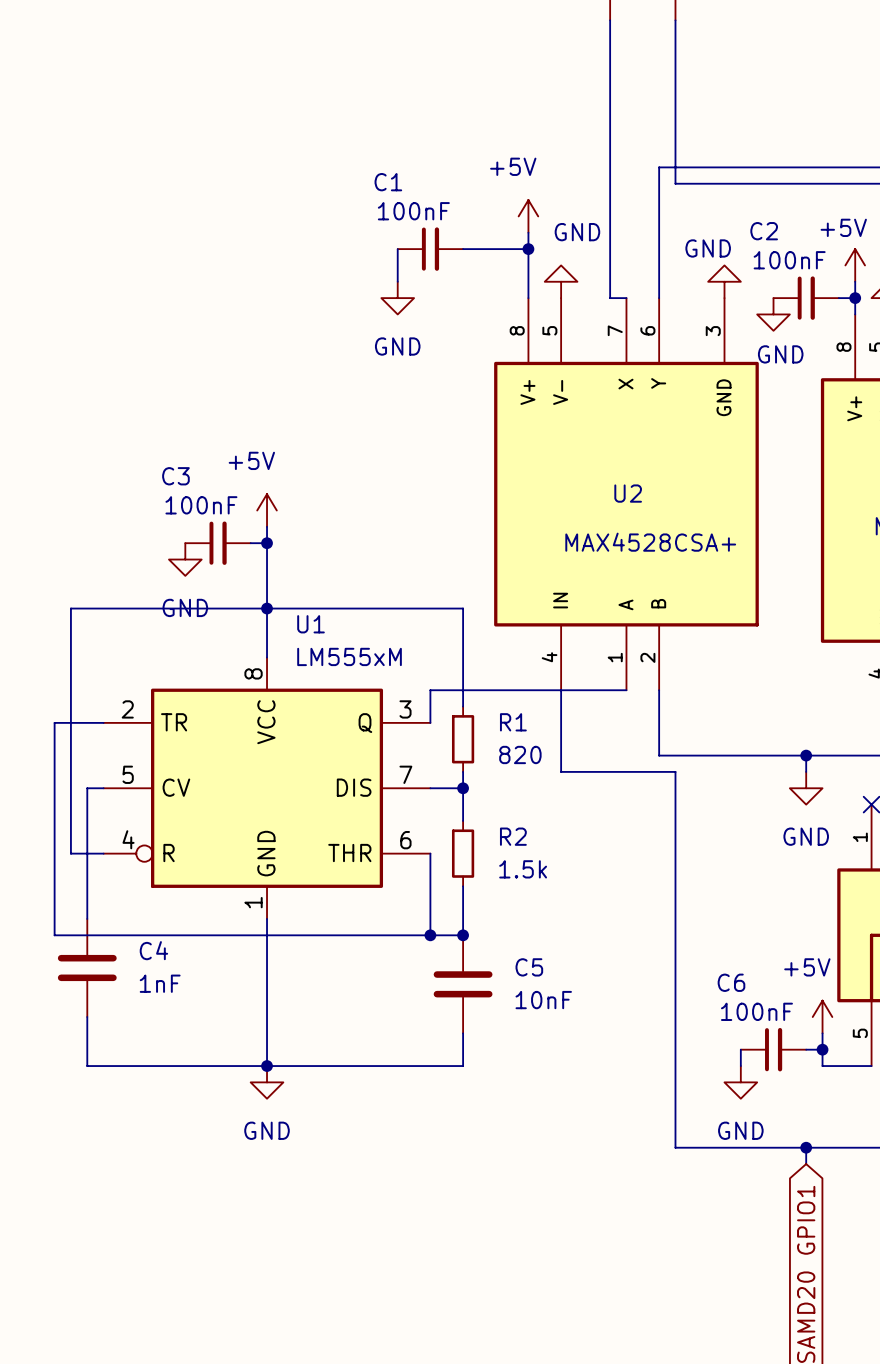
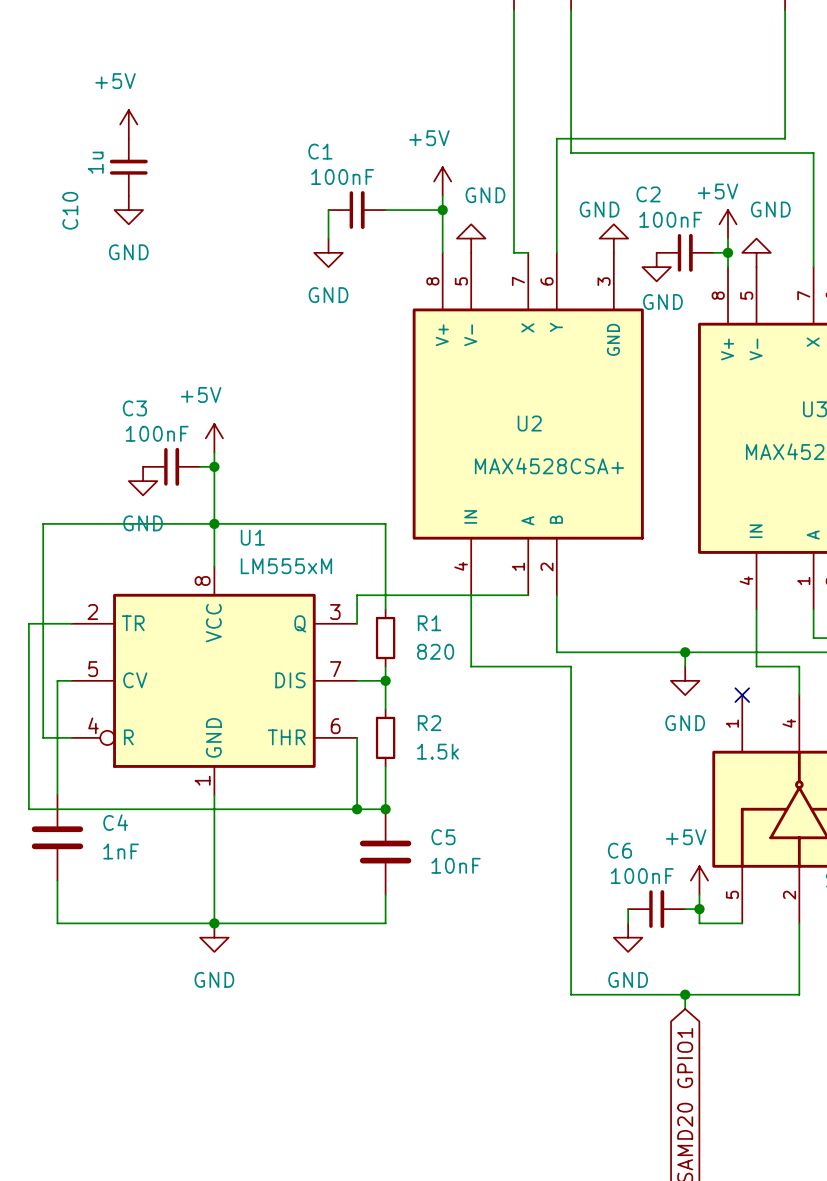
power symbol: none -> +5V (128, 124)
C10: none -> 1u (128, 167)
power symbol: none -> GND (128, 210)

